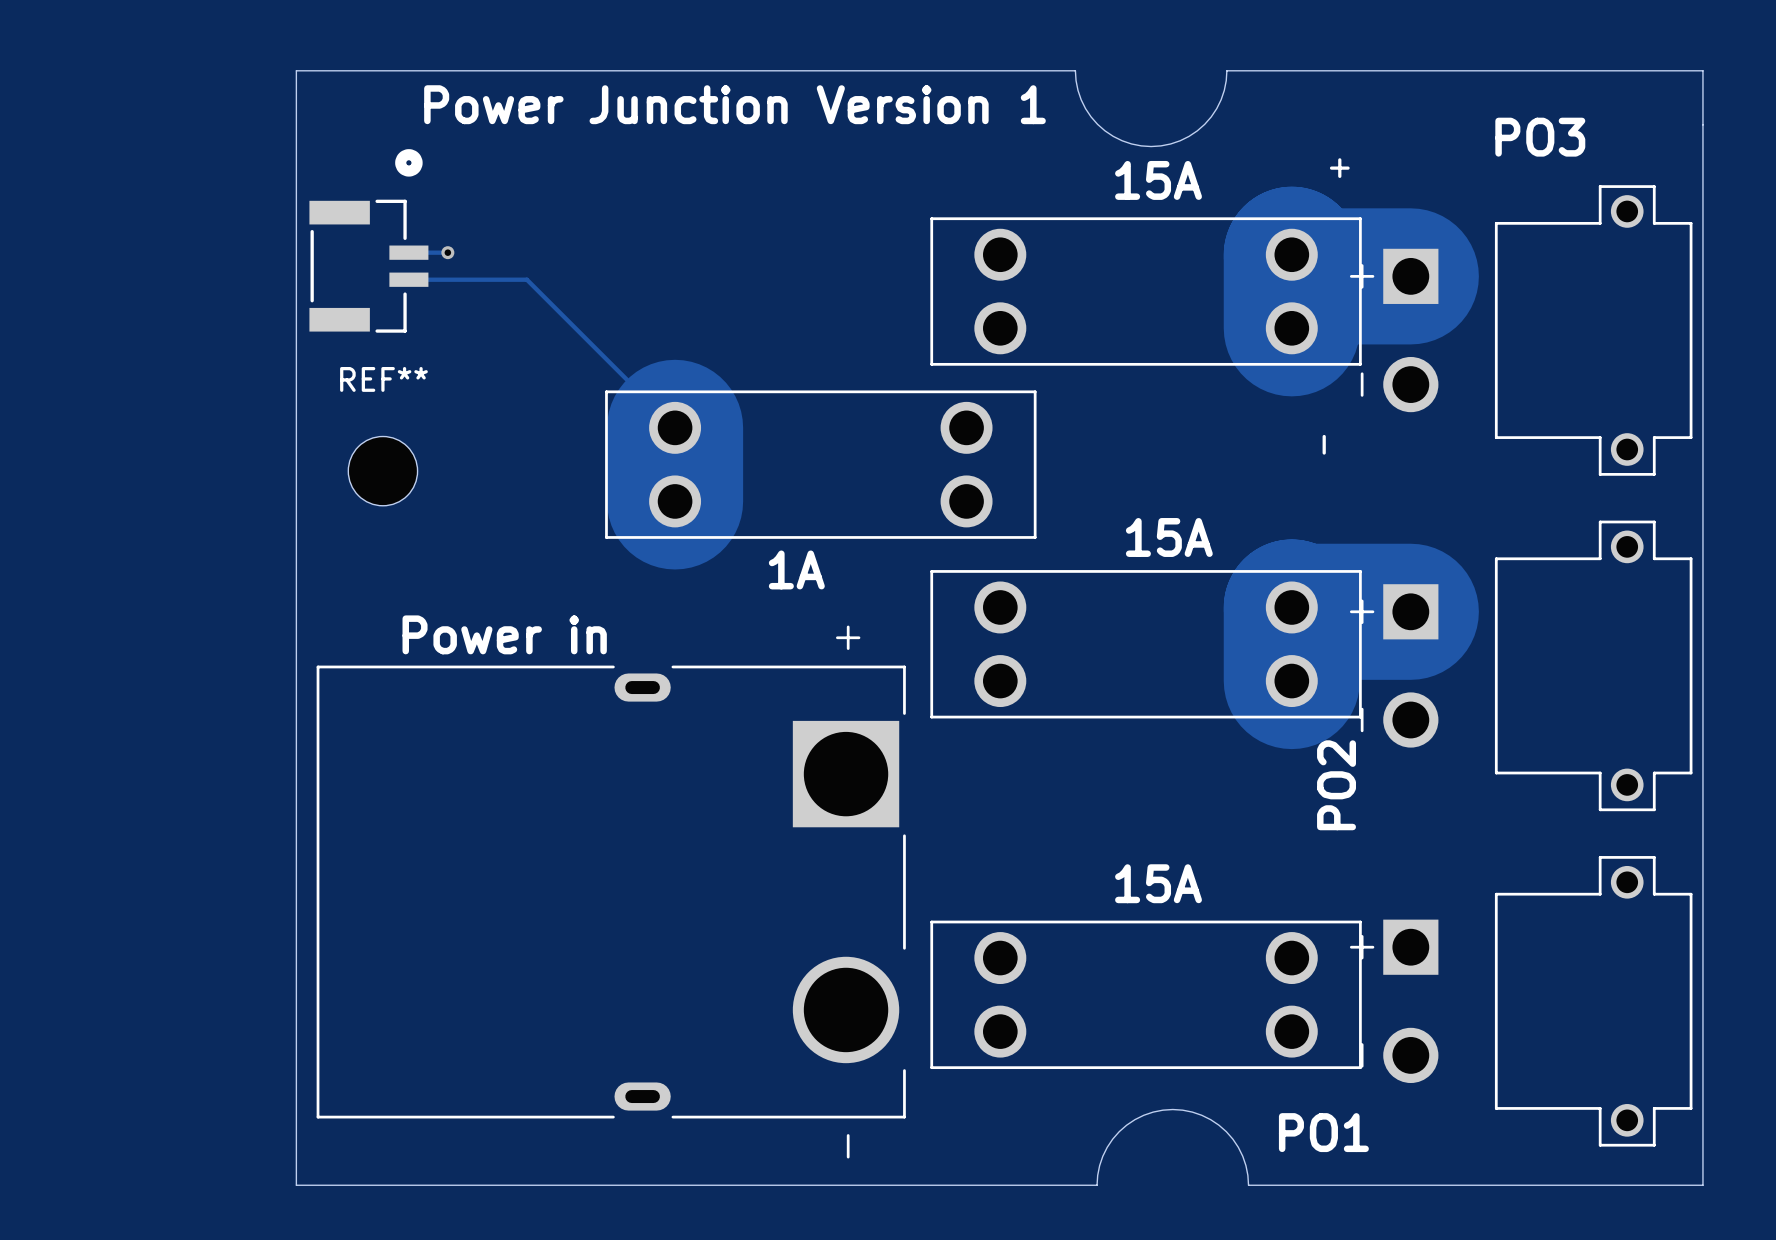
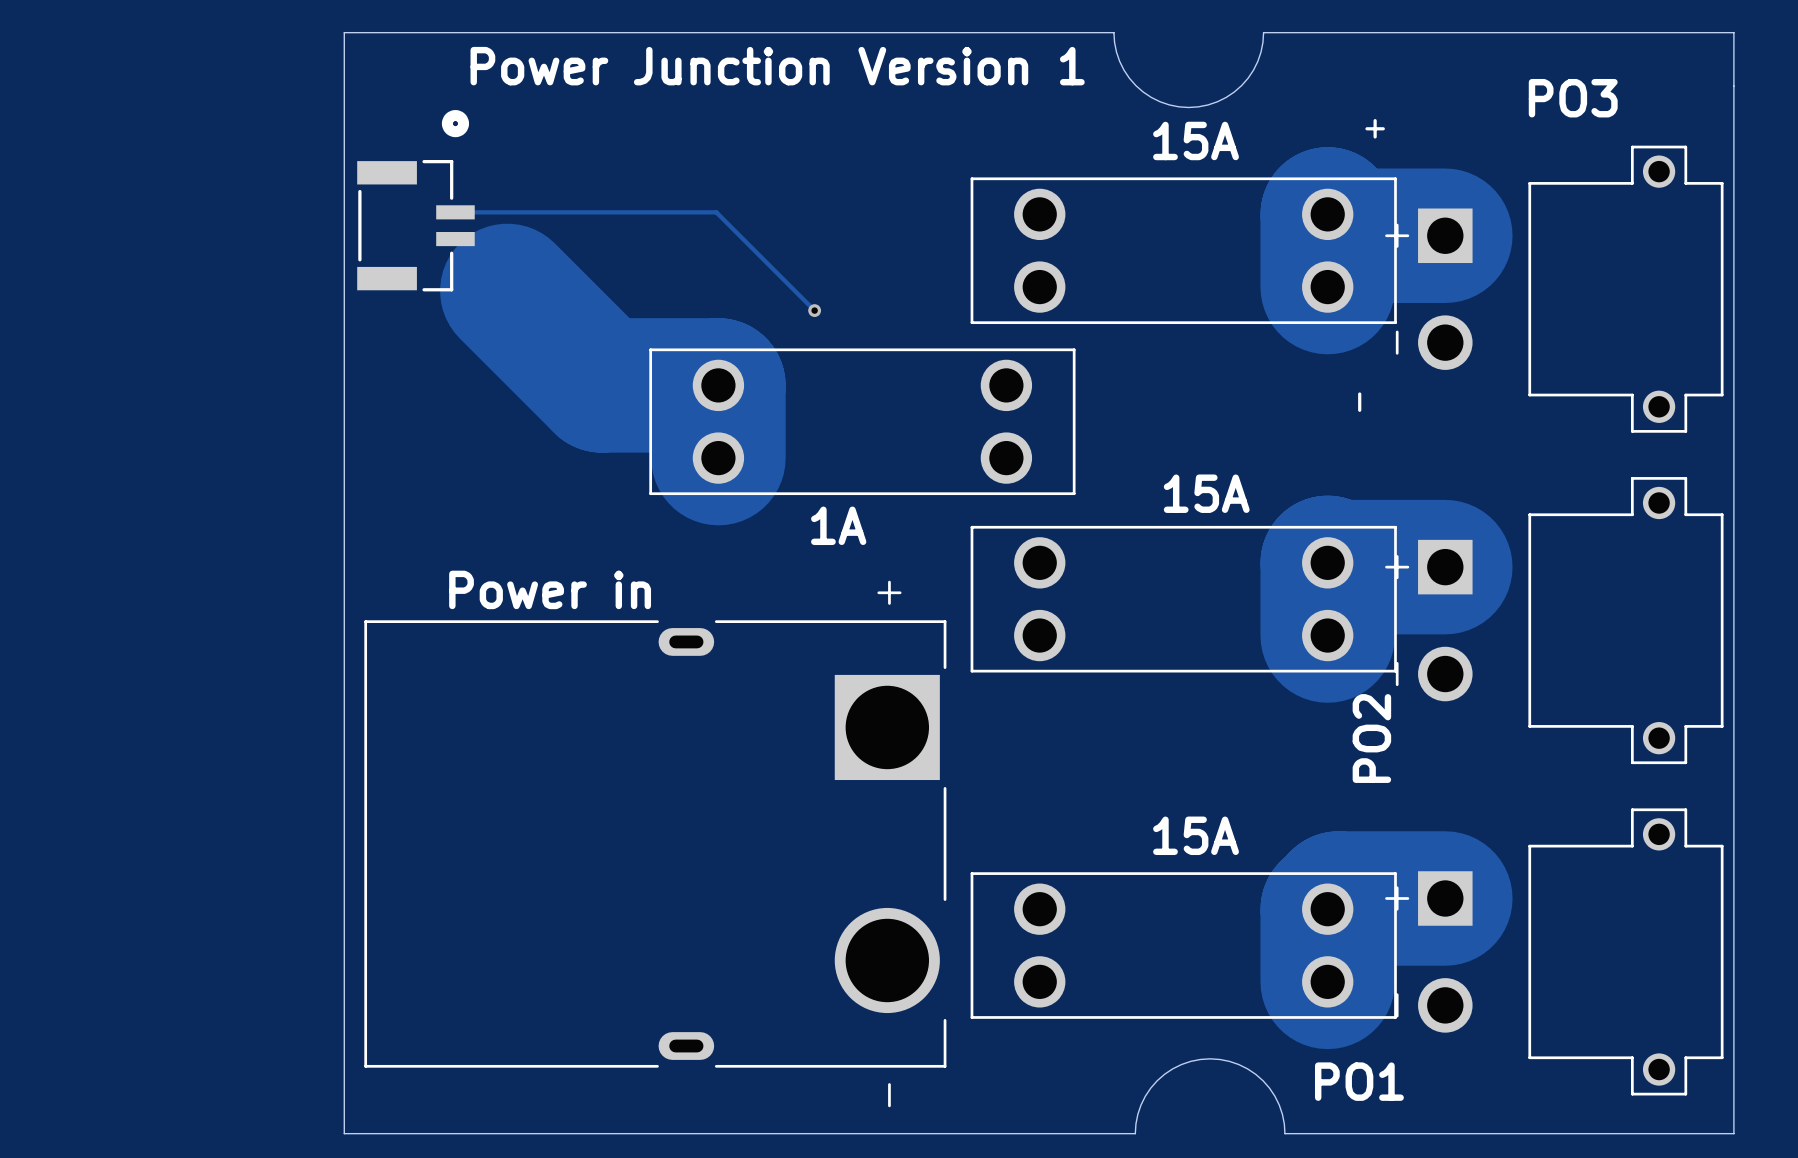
track: none -> (493, 212) (716, 212) (814, 310)
via: (447, 252) -> none
track: (408, 279) (526, 279) (675, 427) -> (507, 290) (601, 385) (718, 385)
via: none -> (814, 310)
REF**: (382, 471) -> none
track: none -> (1445, 898) (1338, 898) (1327, 909) (1327, 981)

